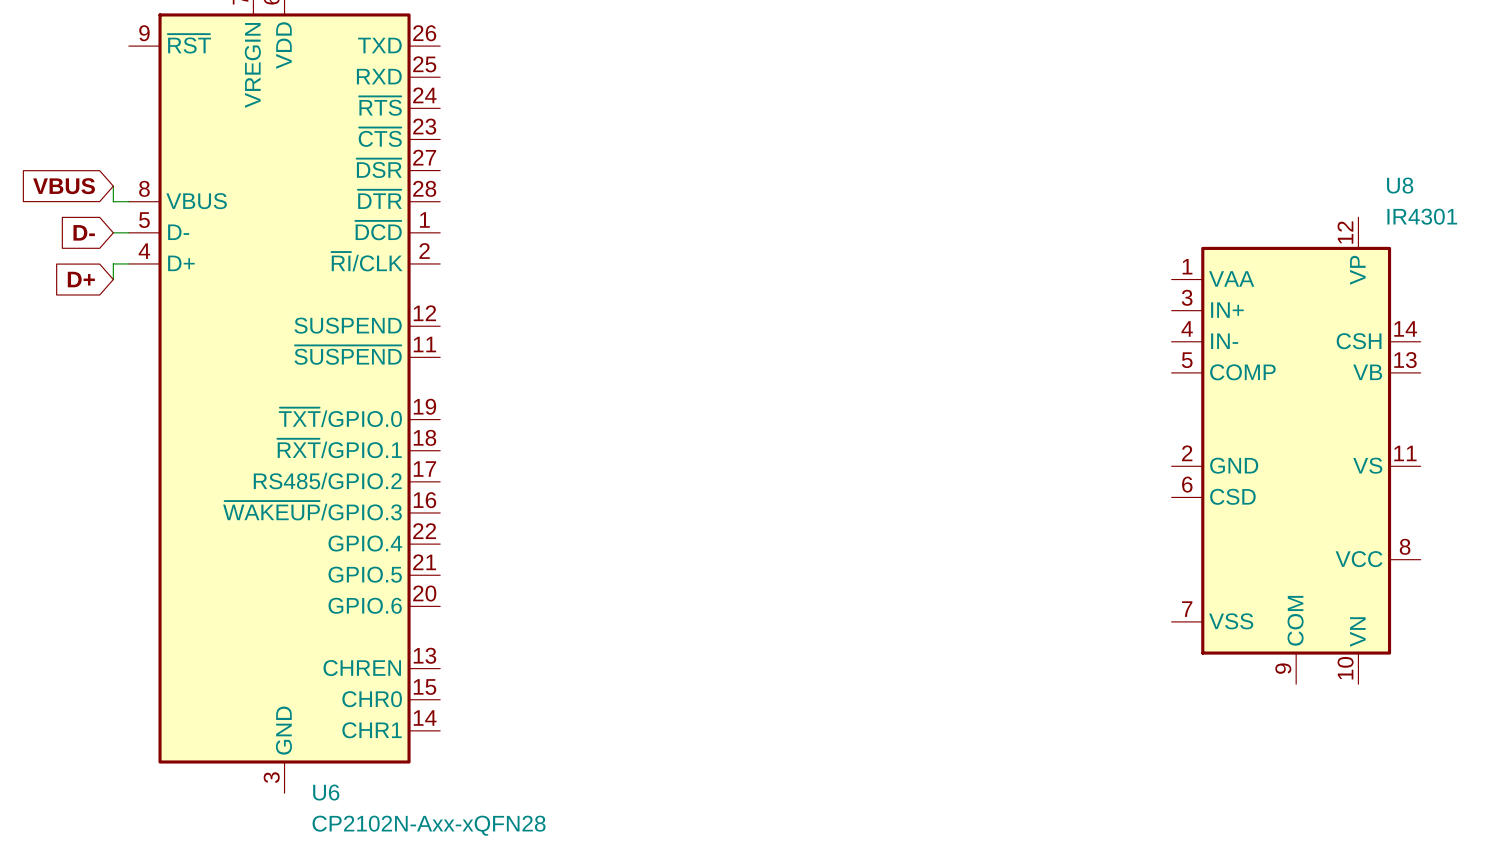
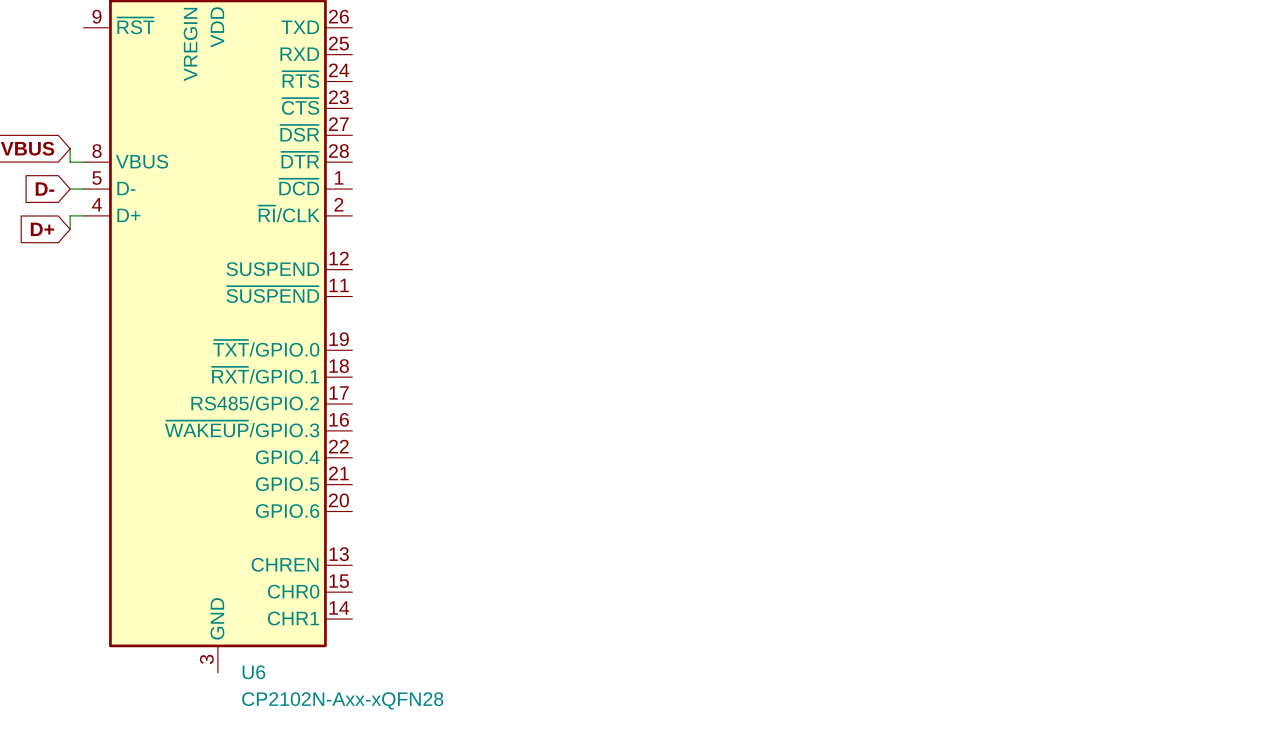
U8: IR4301 (1296, 450) -> none

